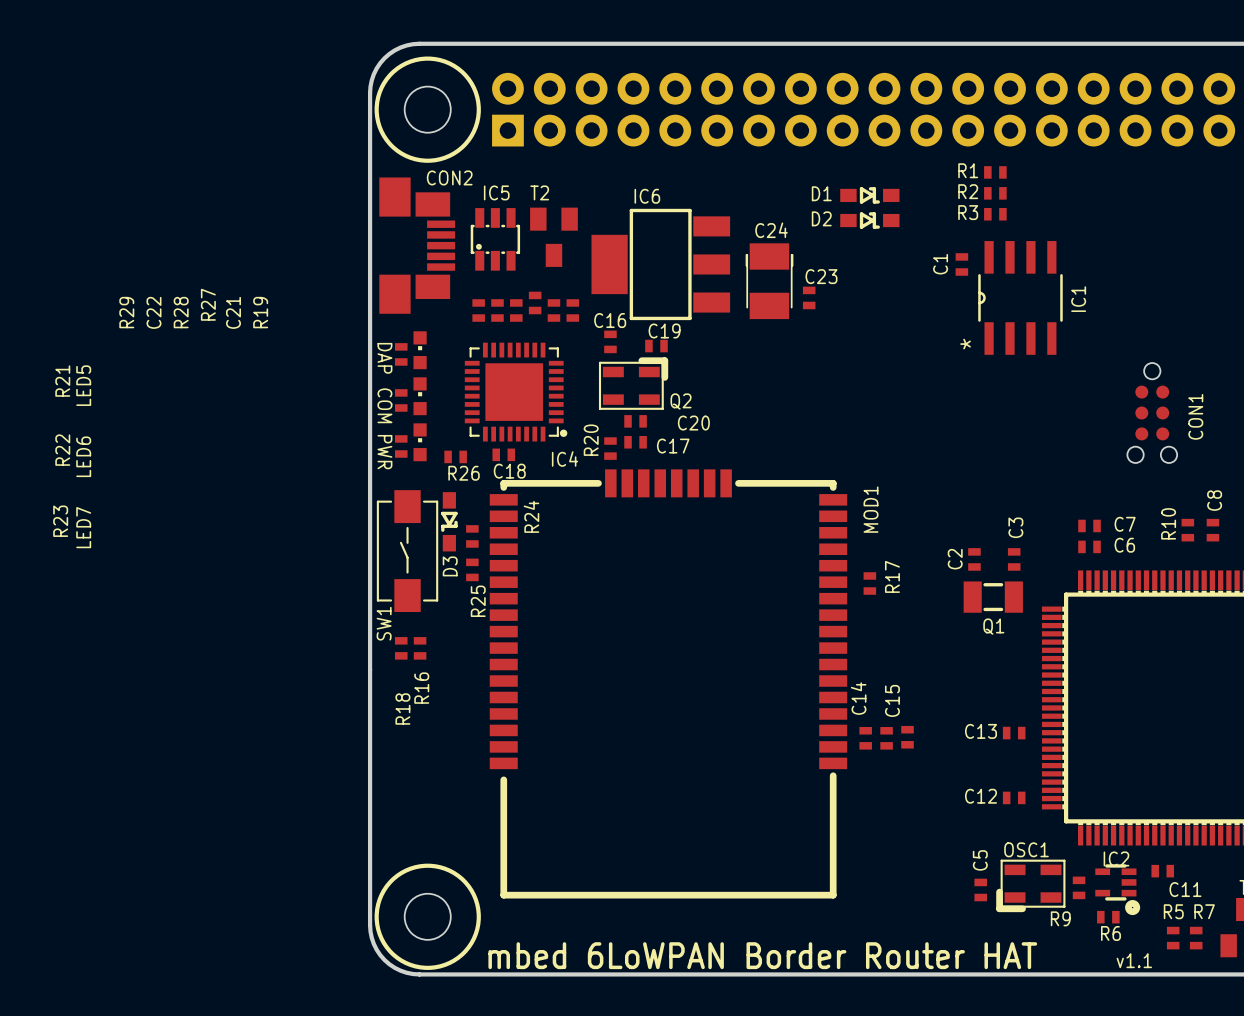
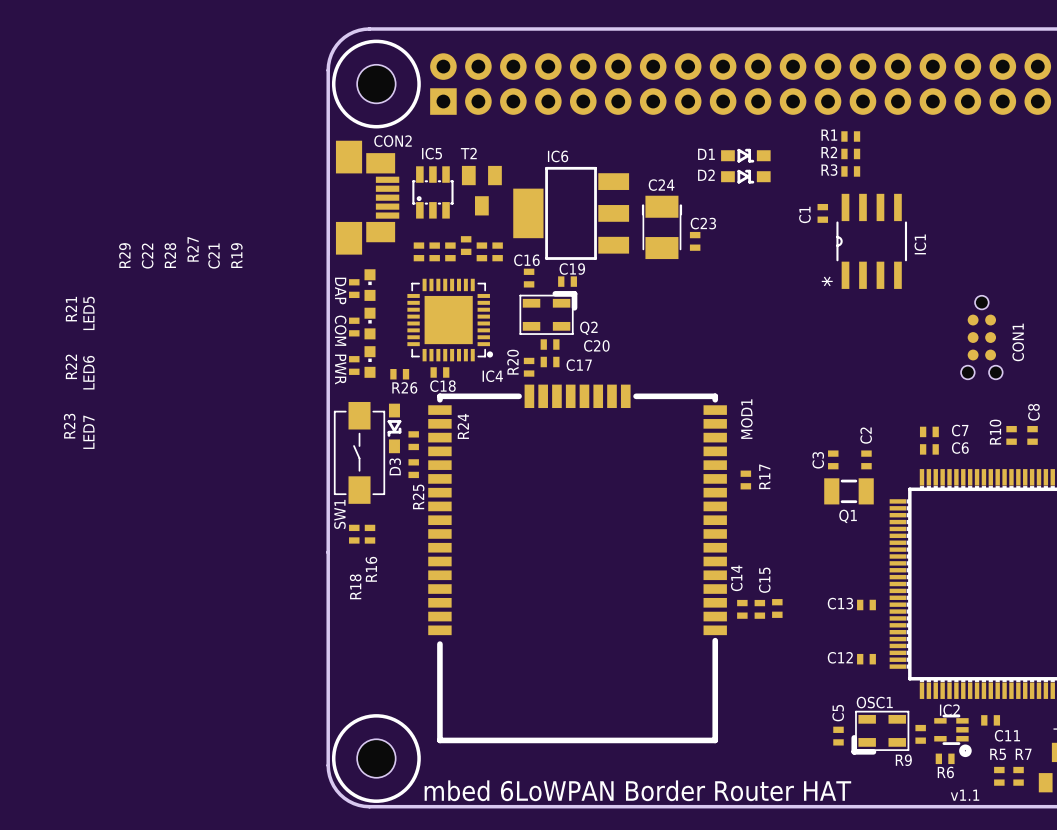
C3 name position: C3 (1015, 527) -> C3 (818, 460)
C2 name position: C2 (955, 559) -> C2 (866, 435)

